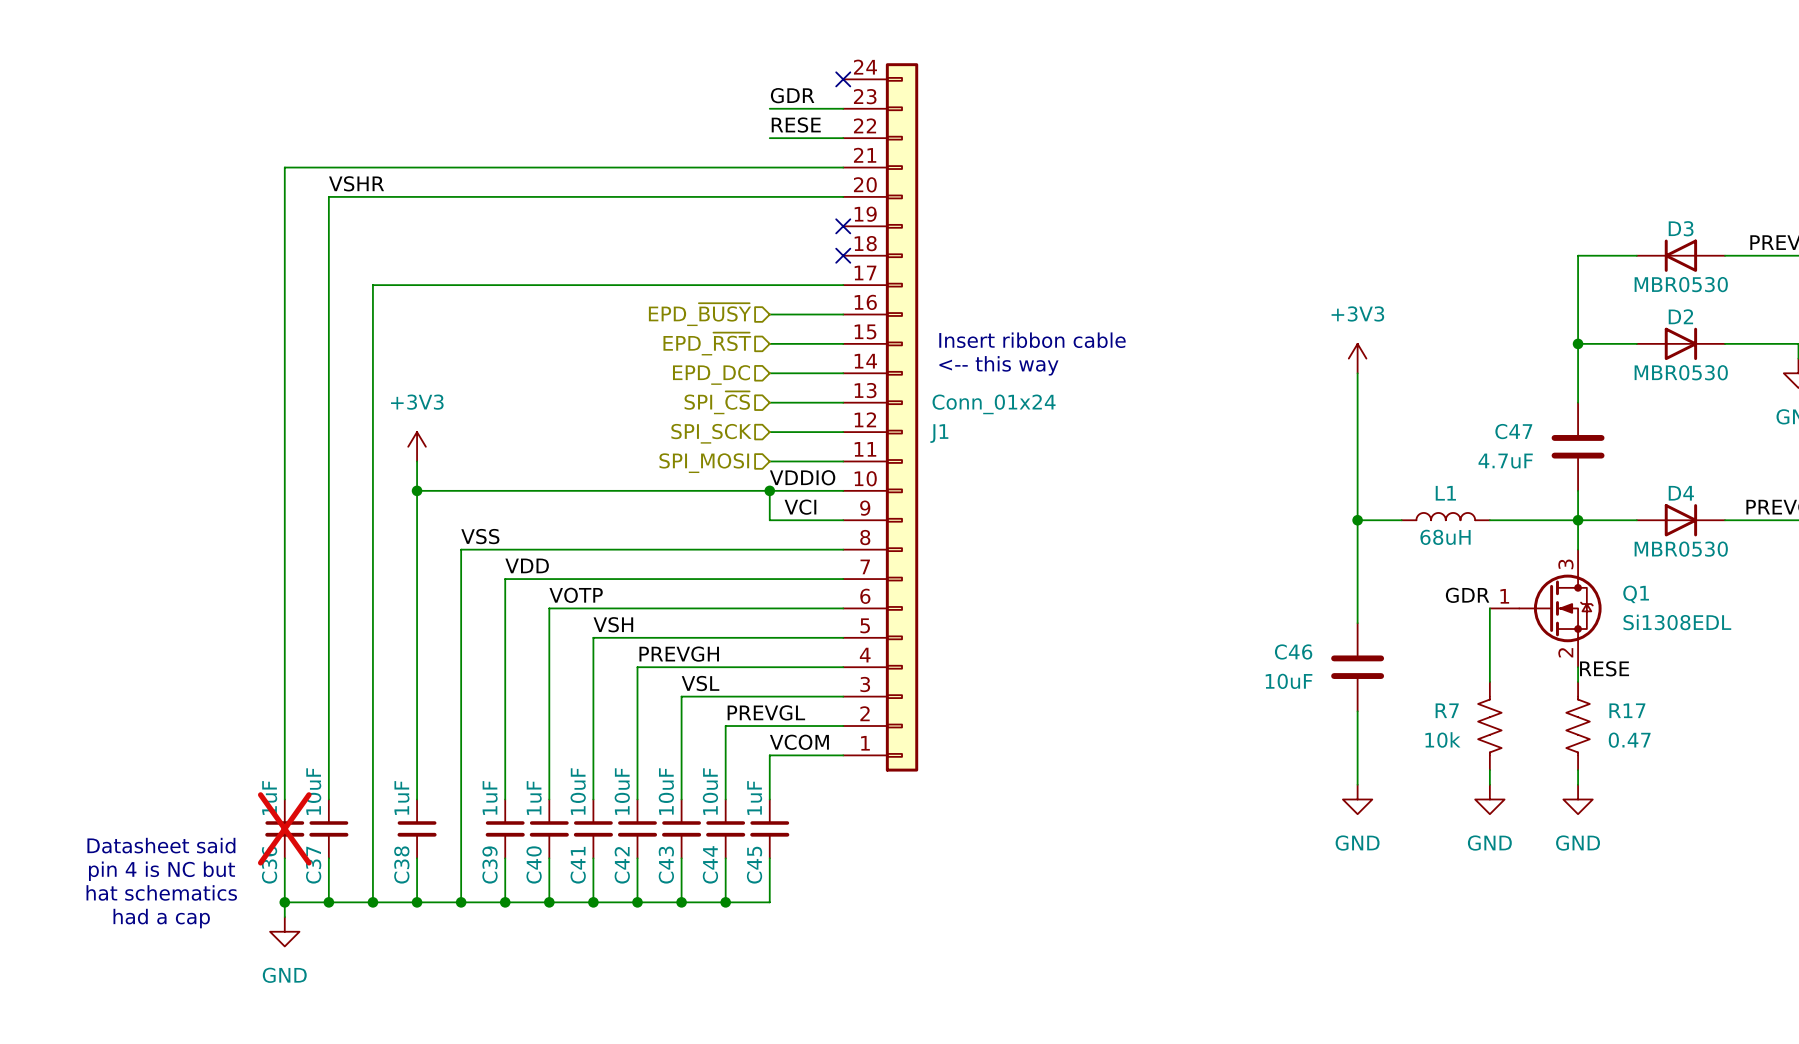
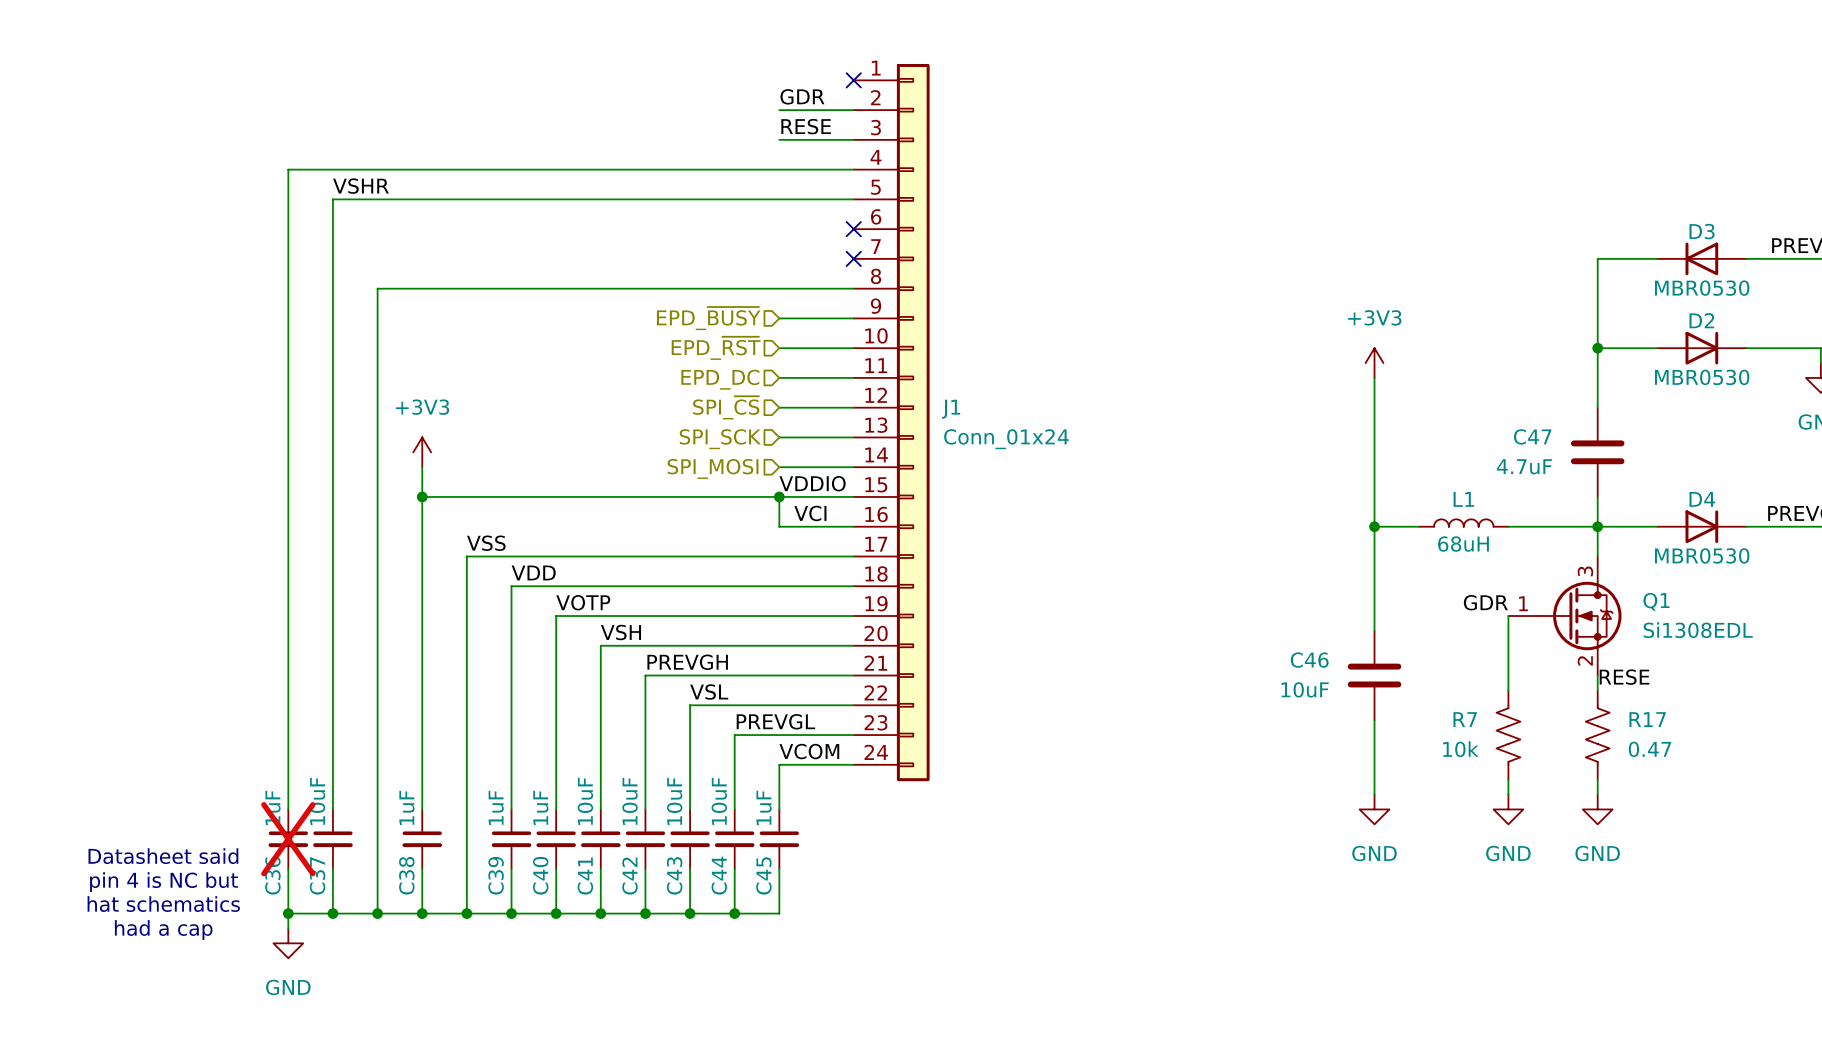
text: Insert ribbon cable (1032, 340) -> none
text: <-- this way (998, 365) -> none
J1 flip: as is (902, 417) -> up-down (913, 422)

